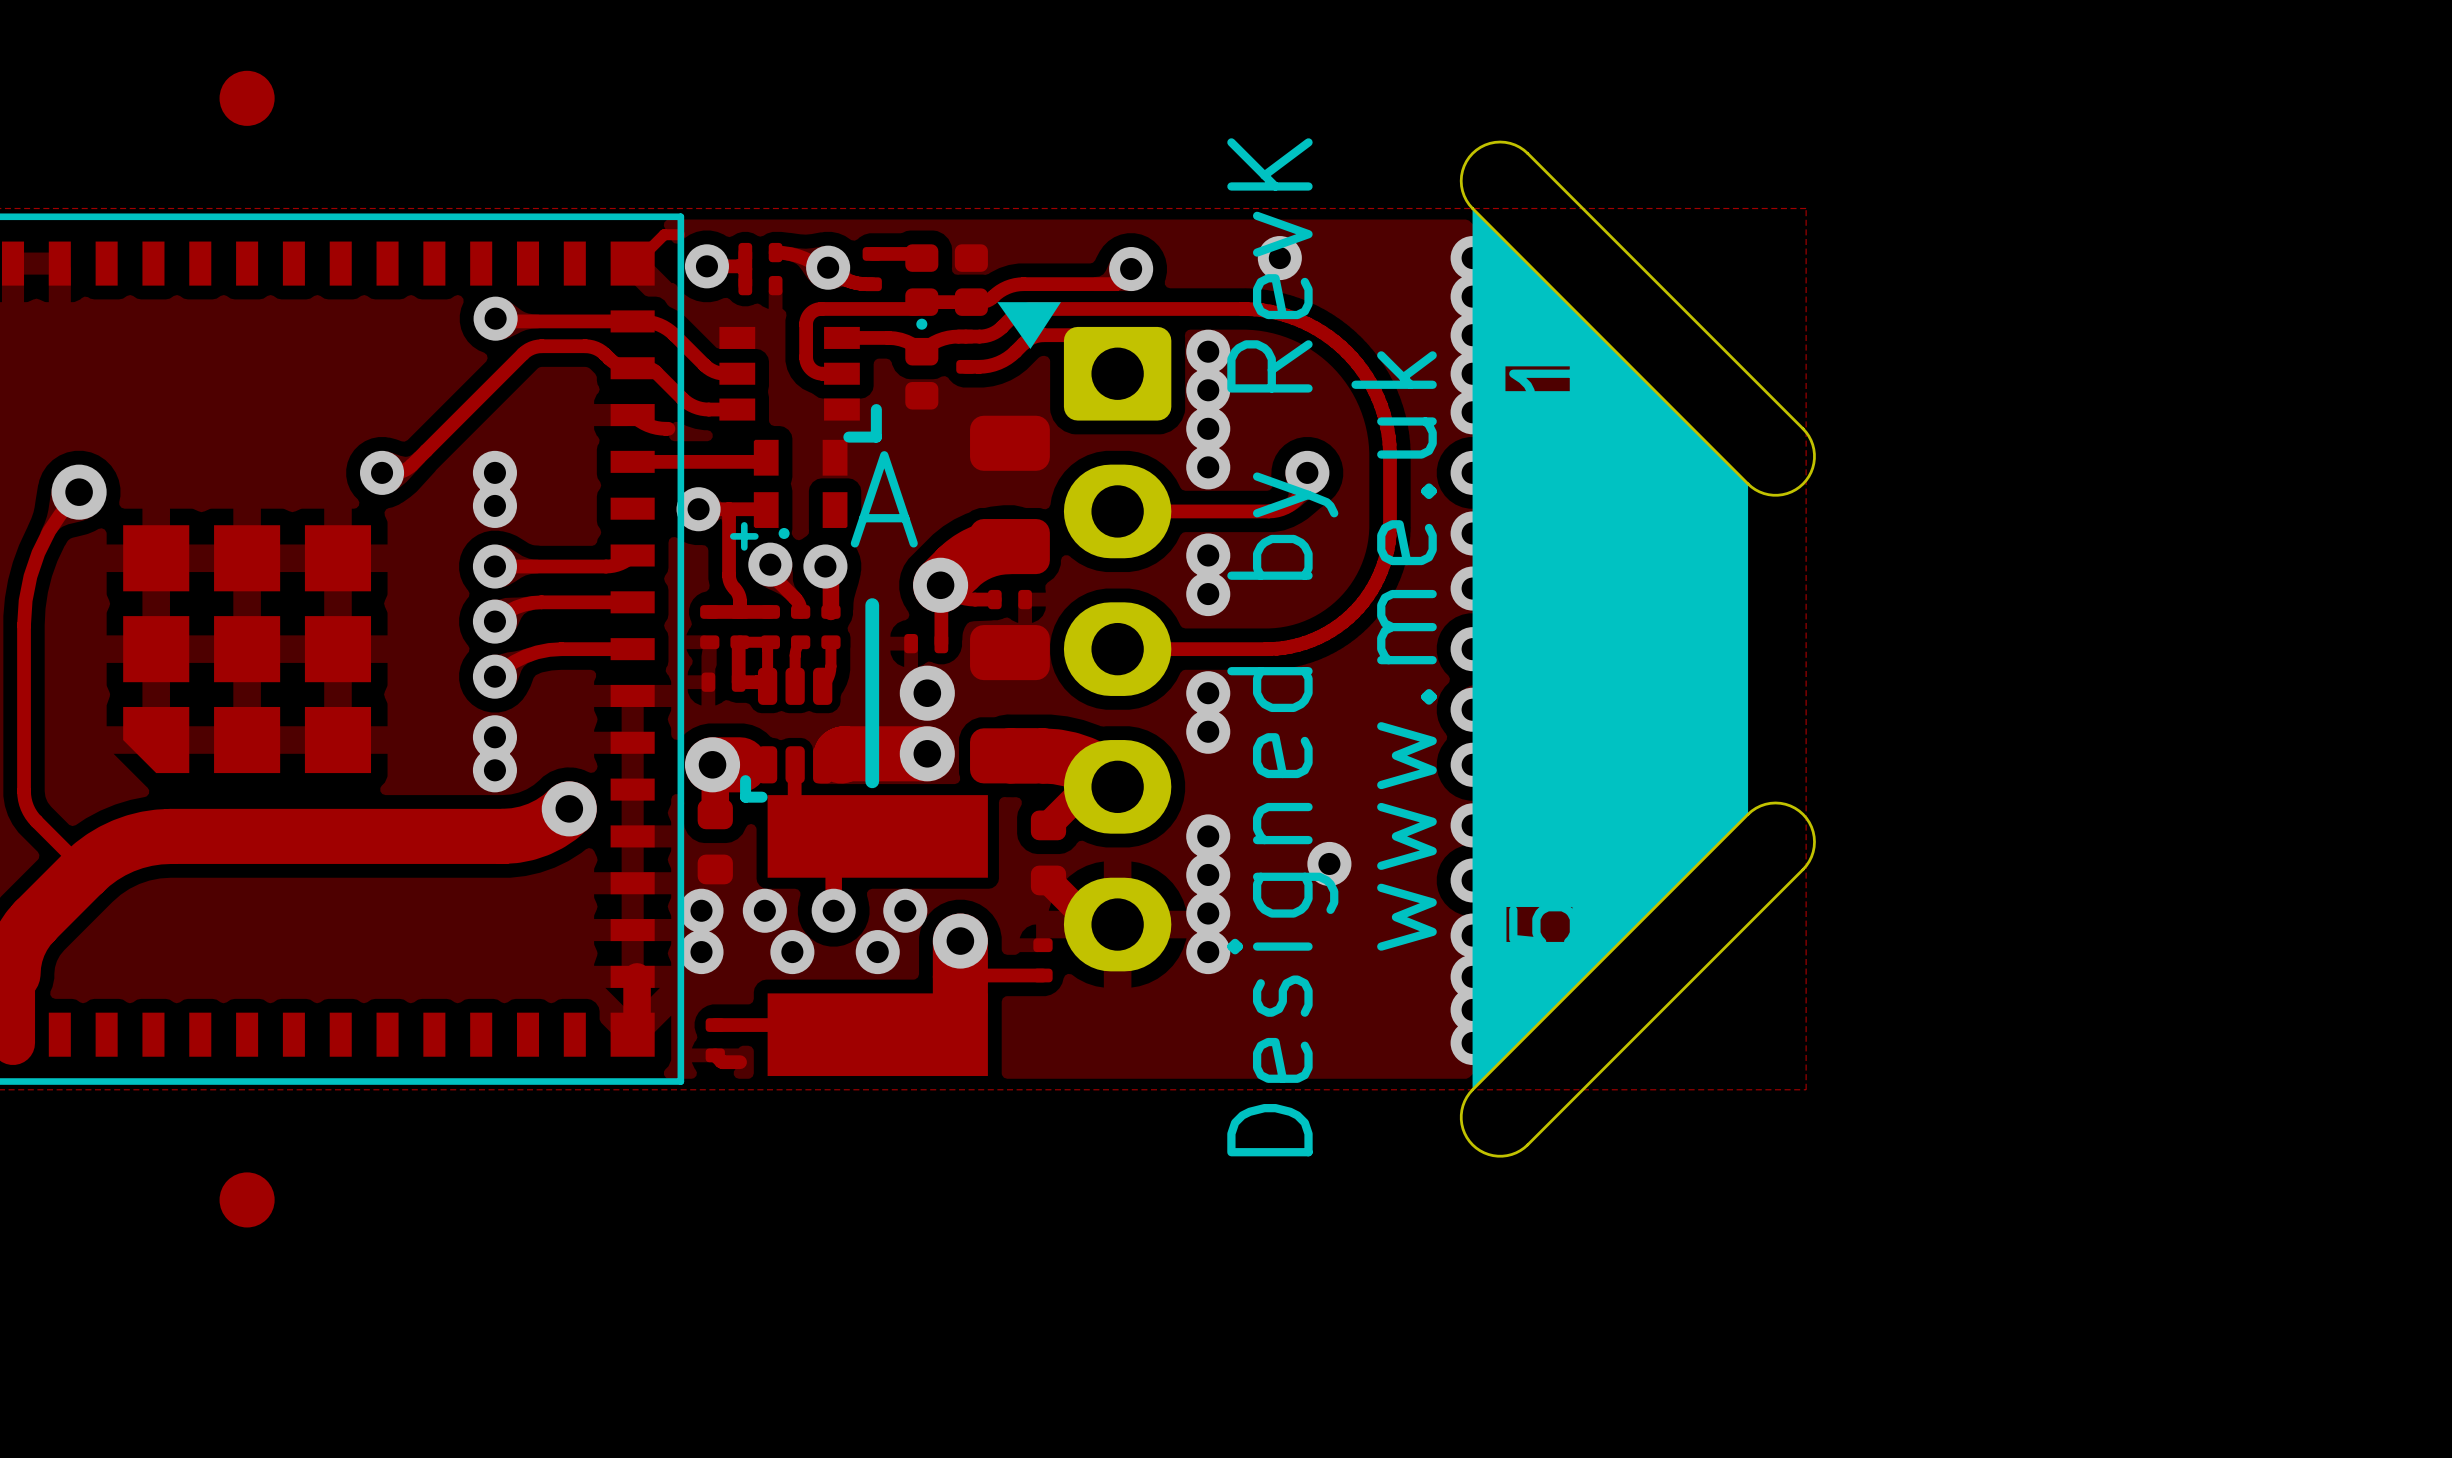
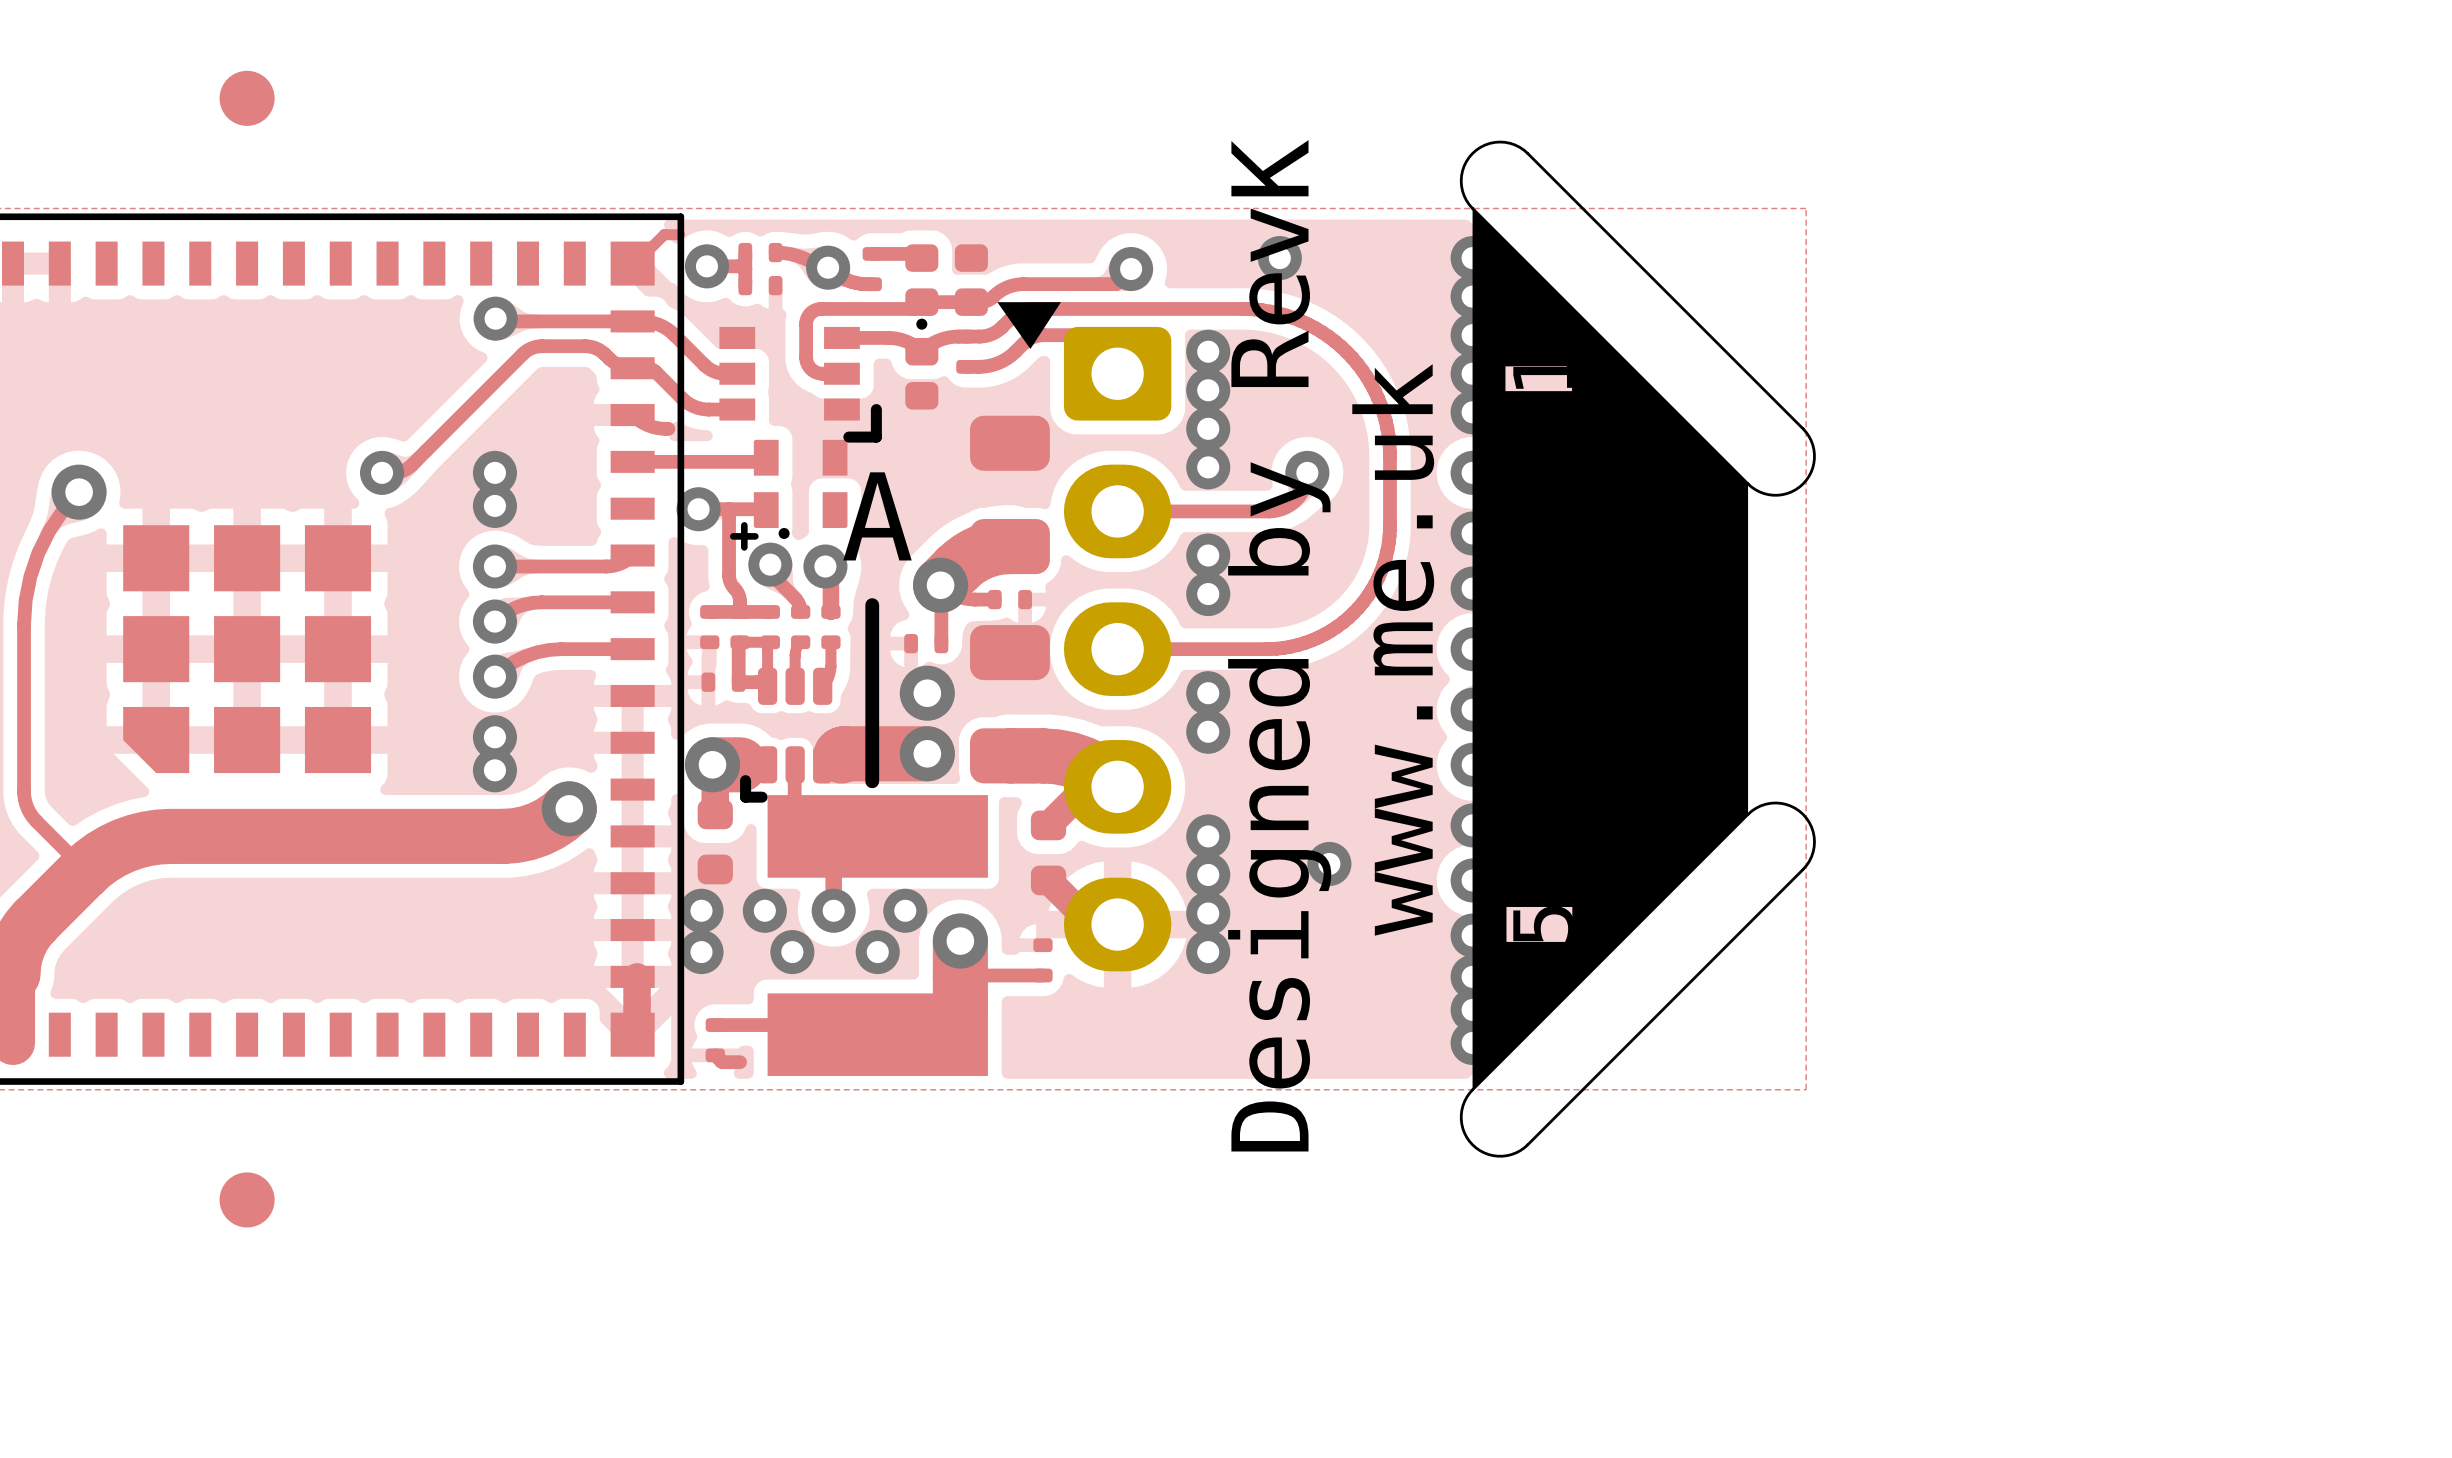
text position: A (884, 499) -> A (877, 516)

